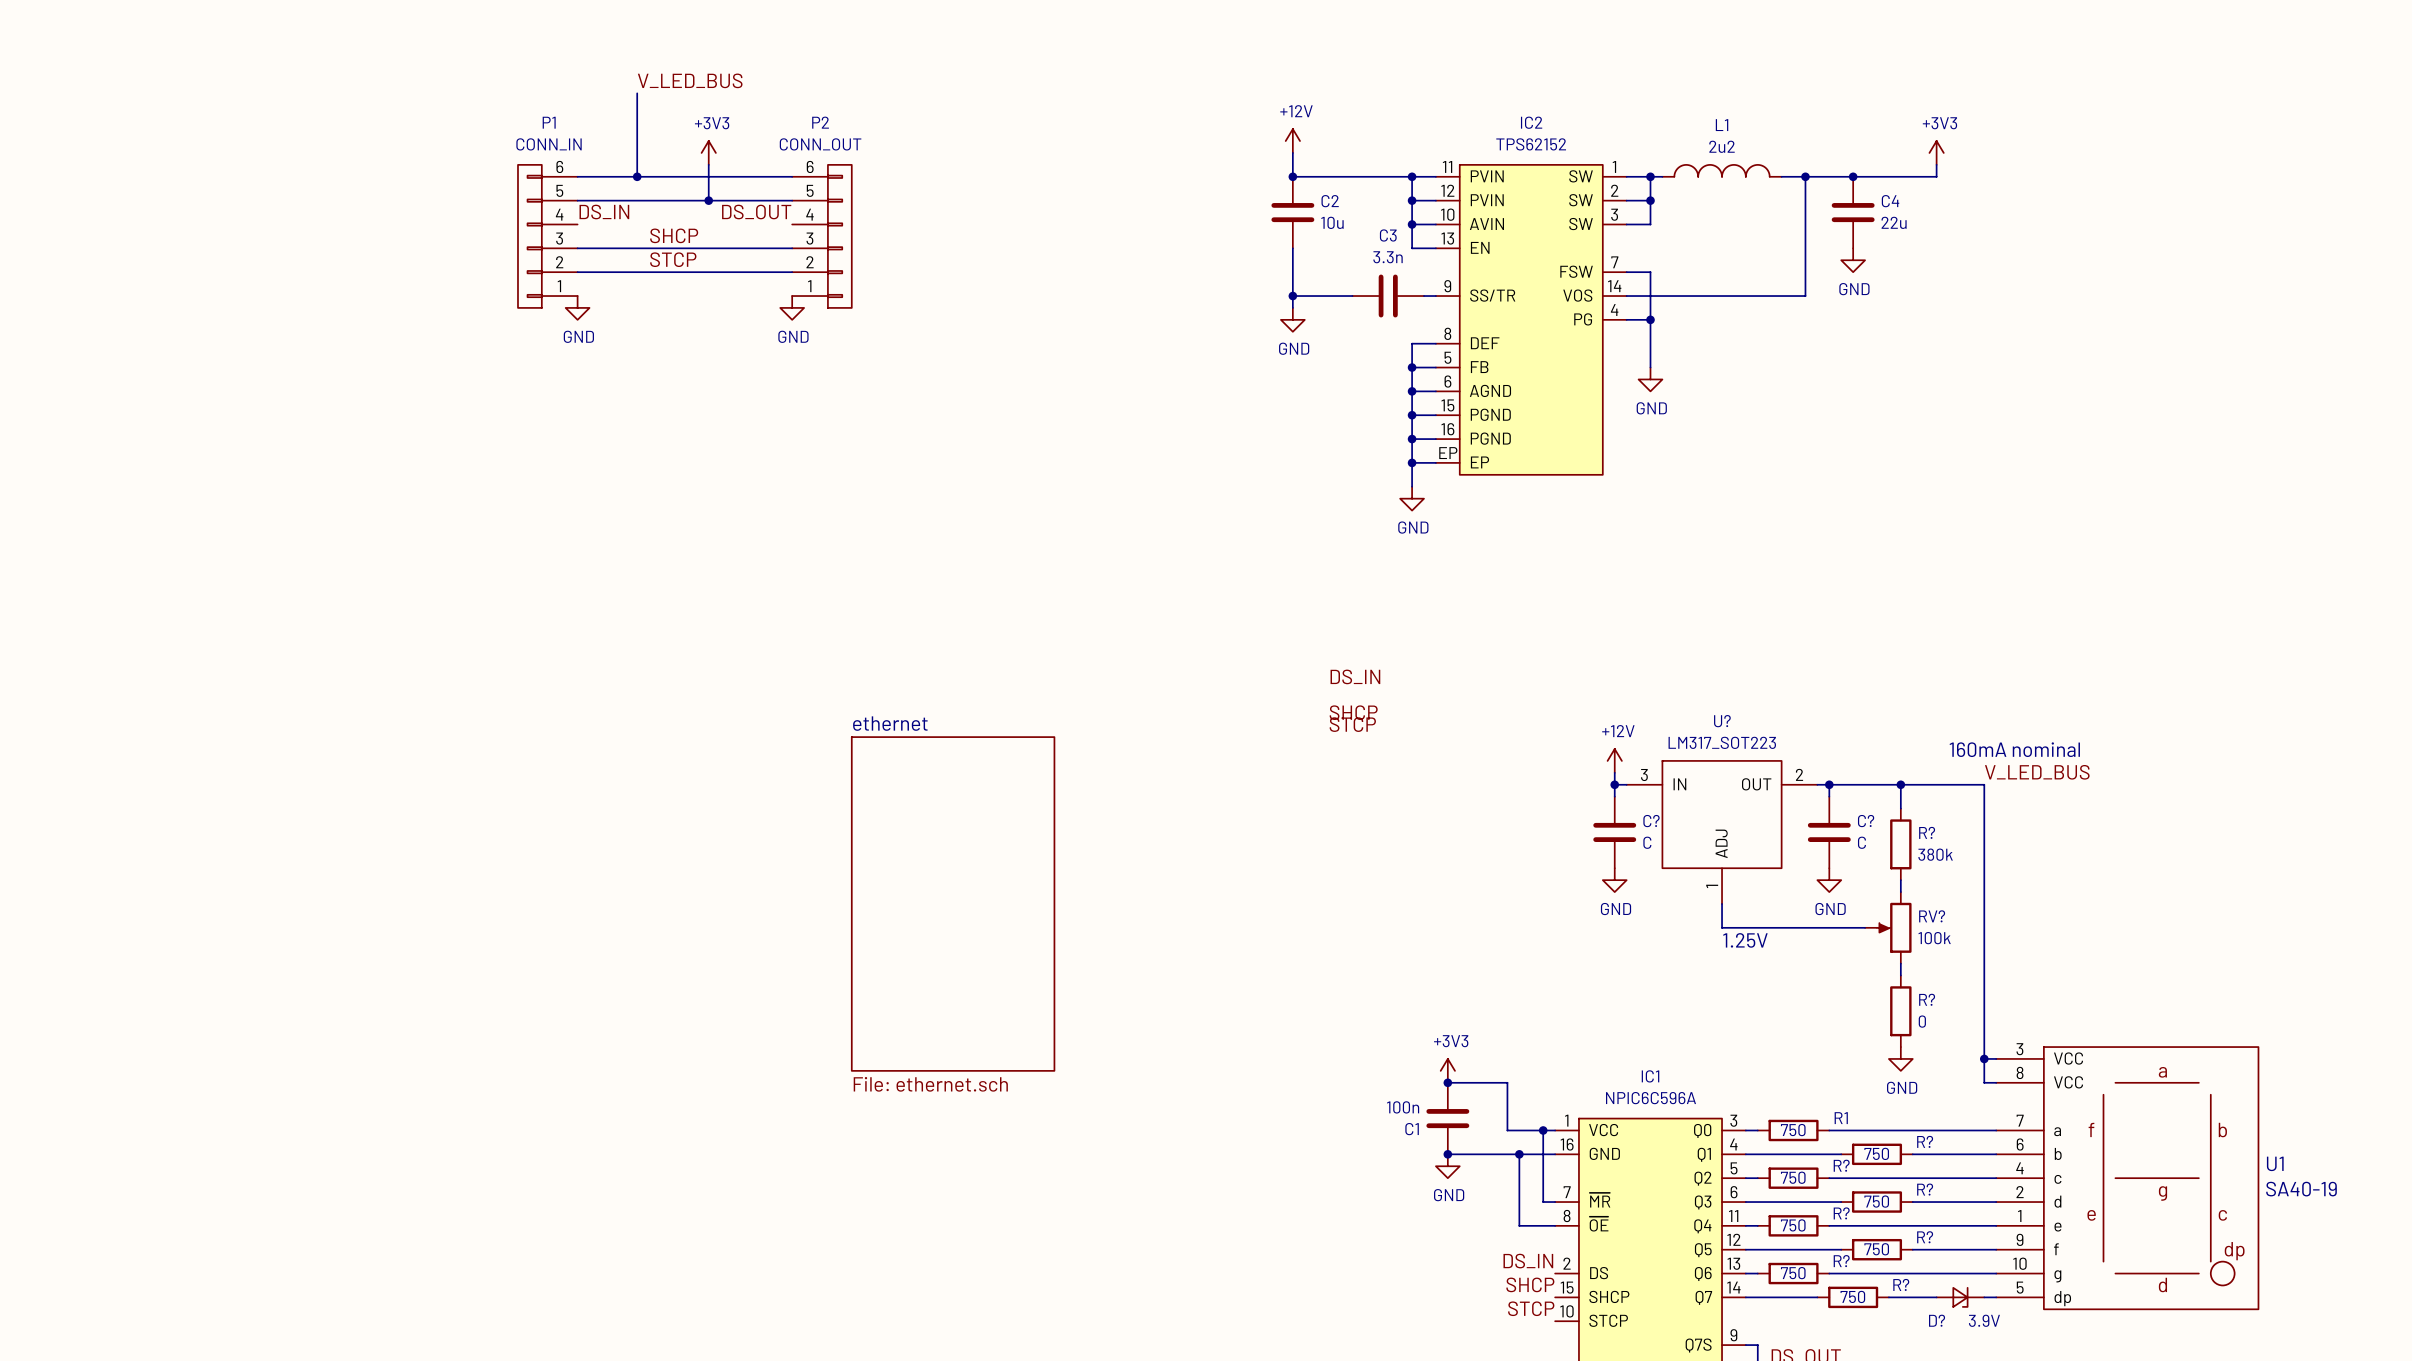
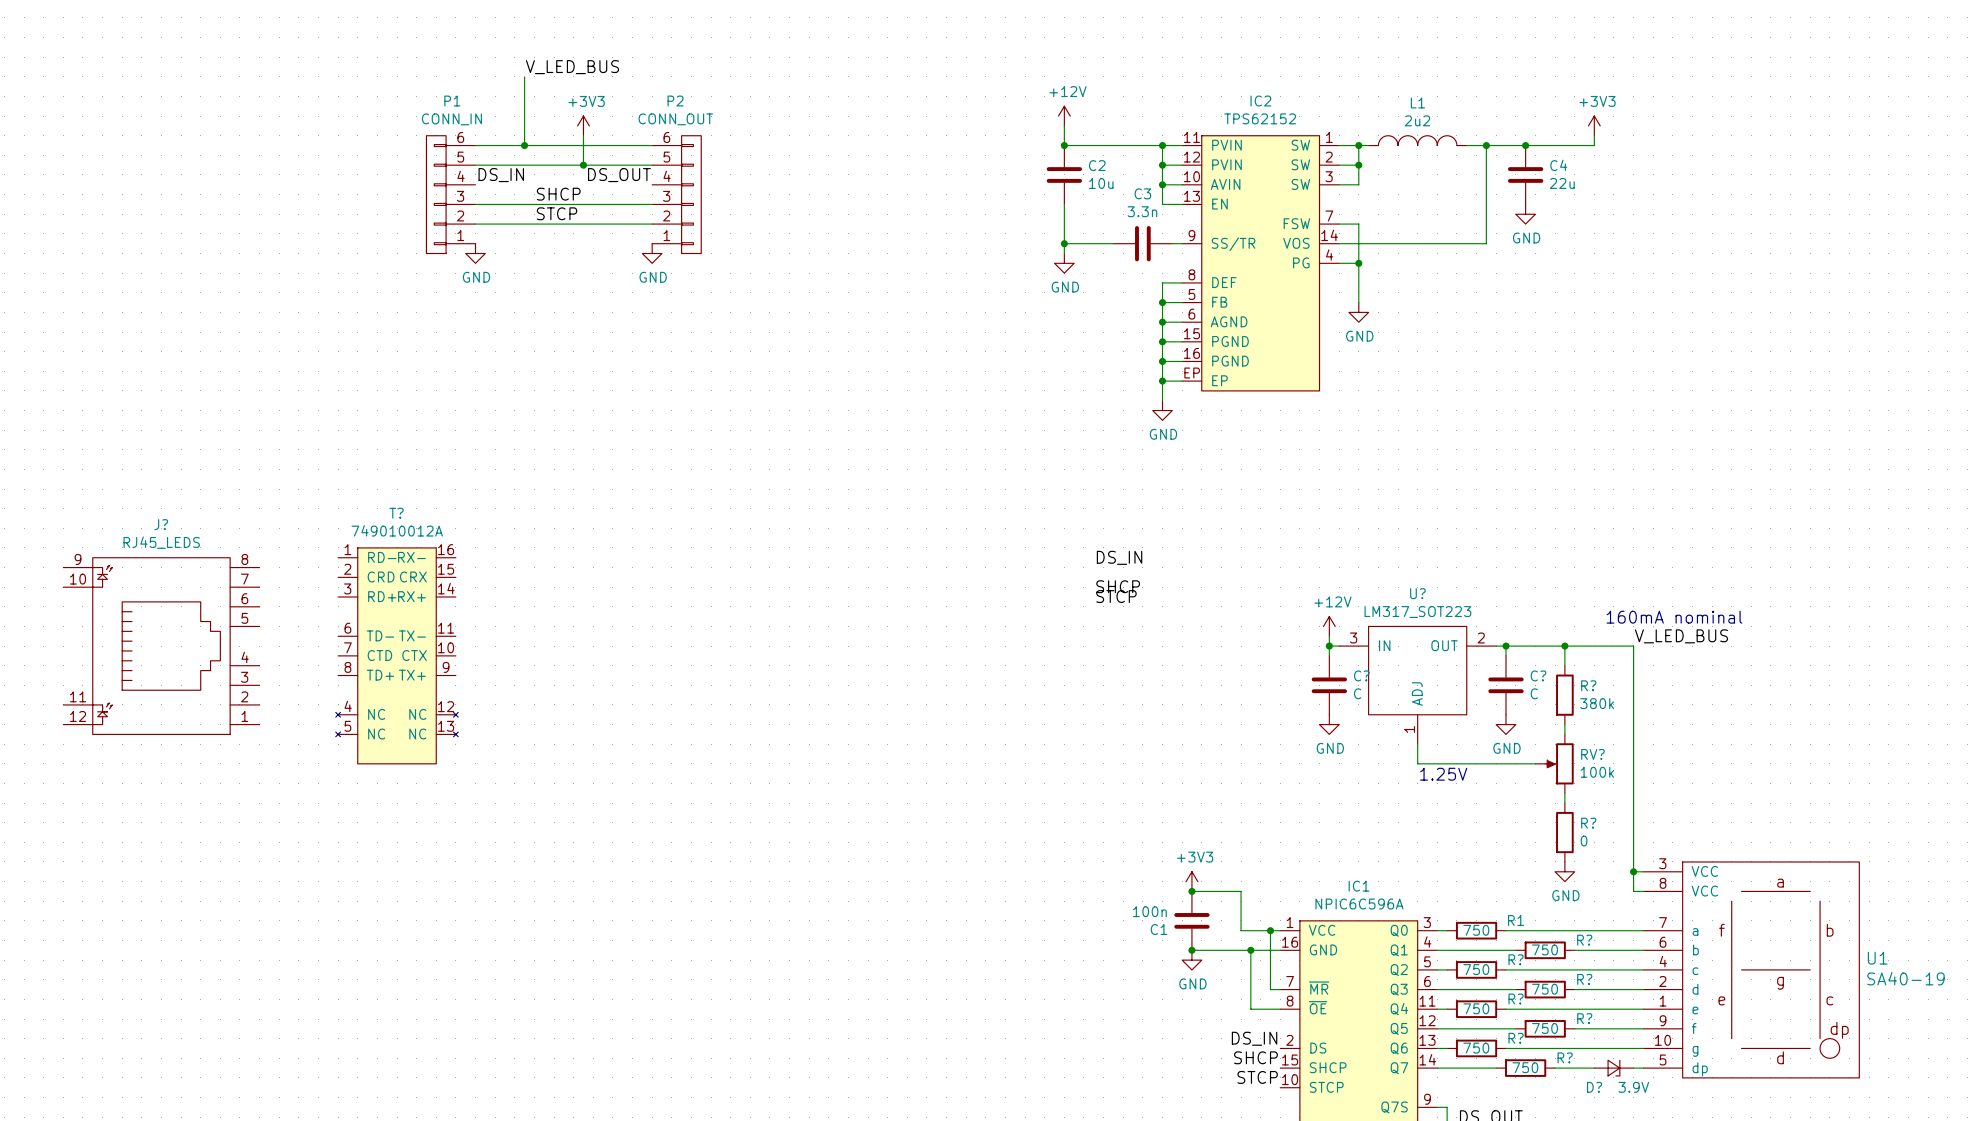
J?: none -> RJ45_LEDS (161, 646)
T?: none -> 749010012A (397, 655)
sheet ethernet: File: ethernet.sch (953, 903) -> none

